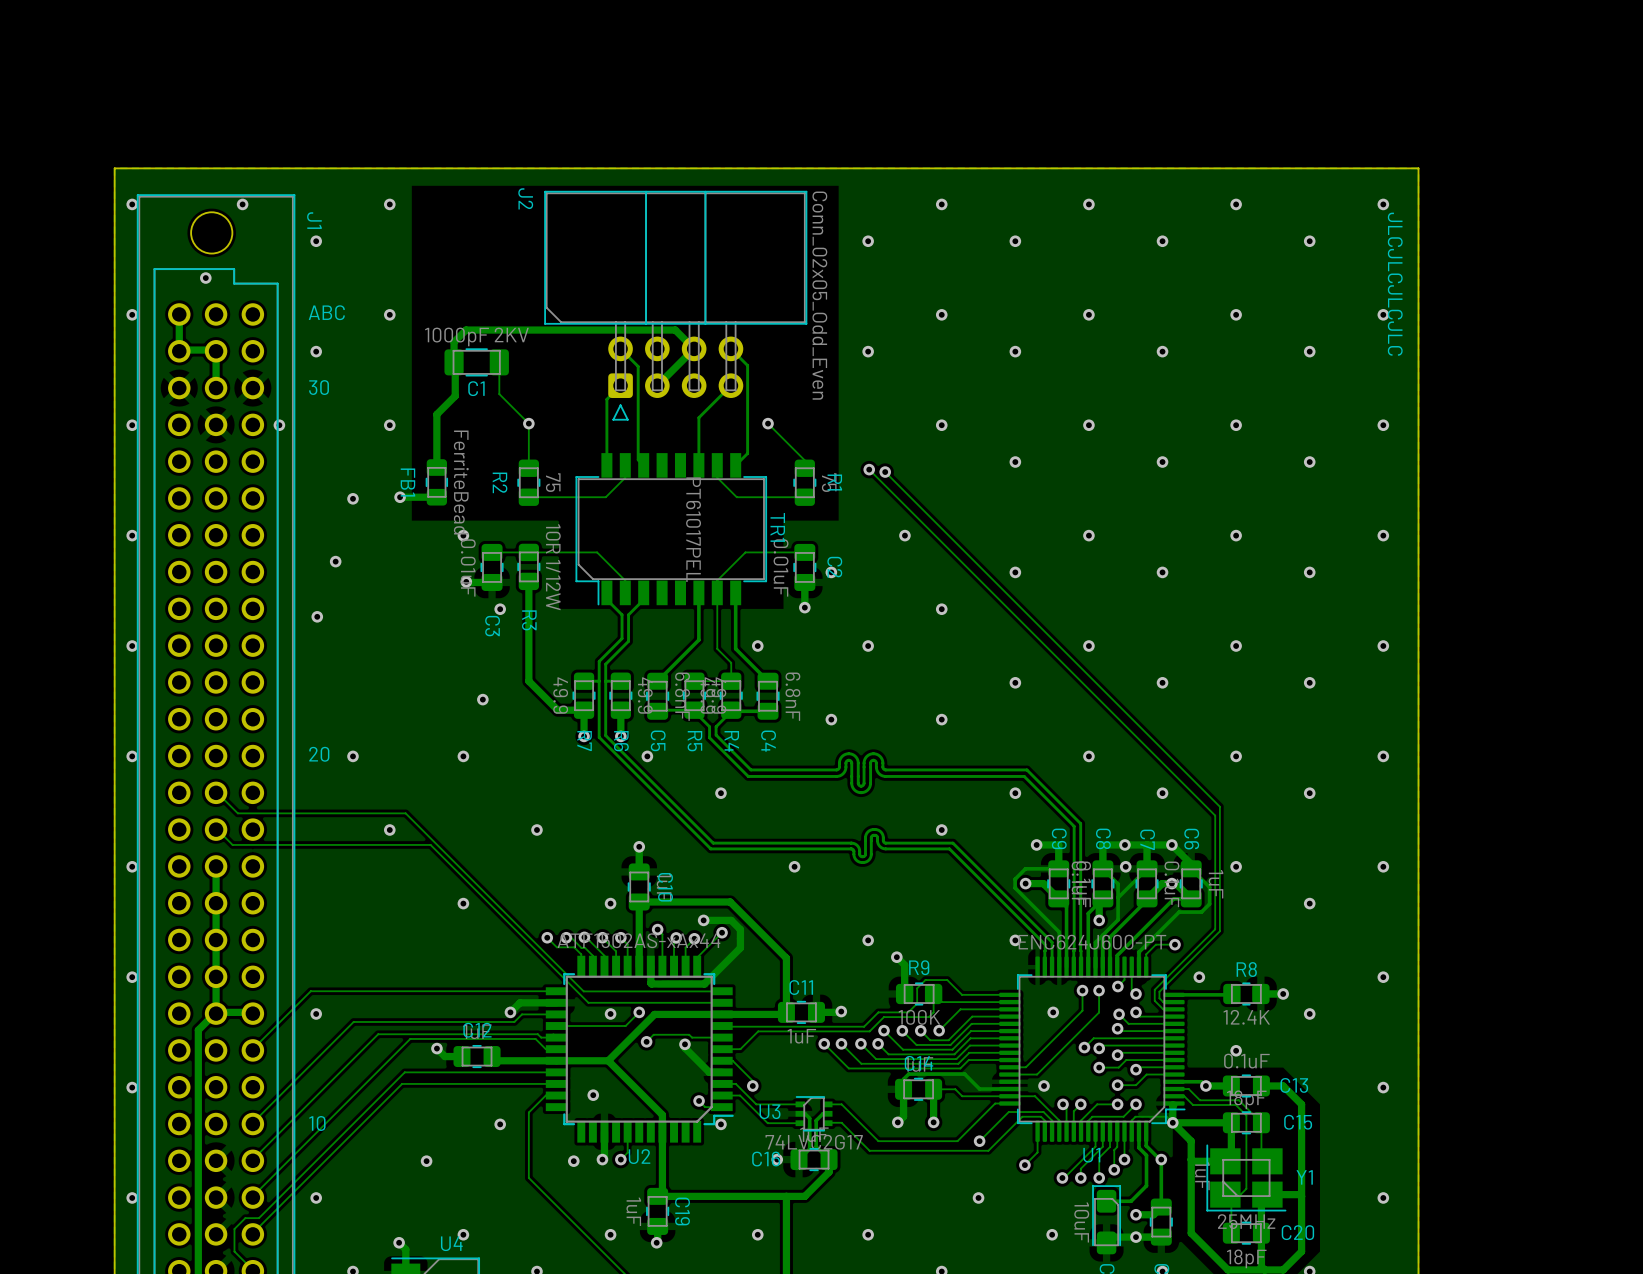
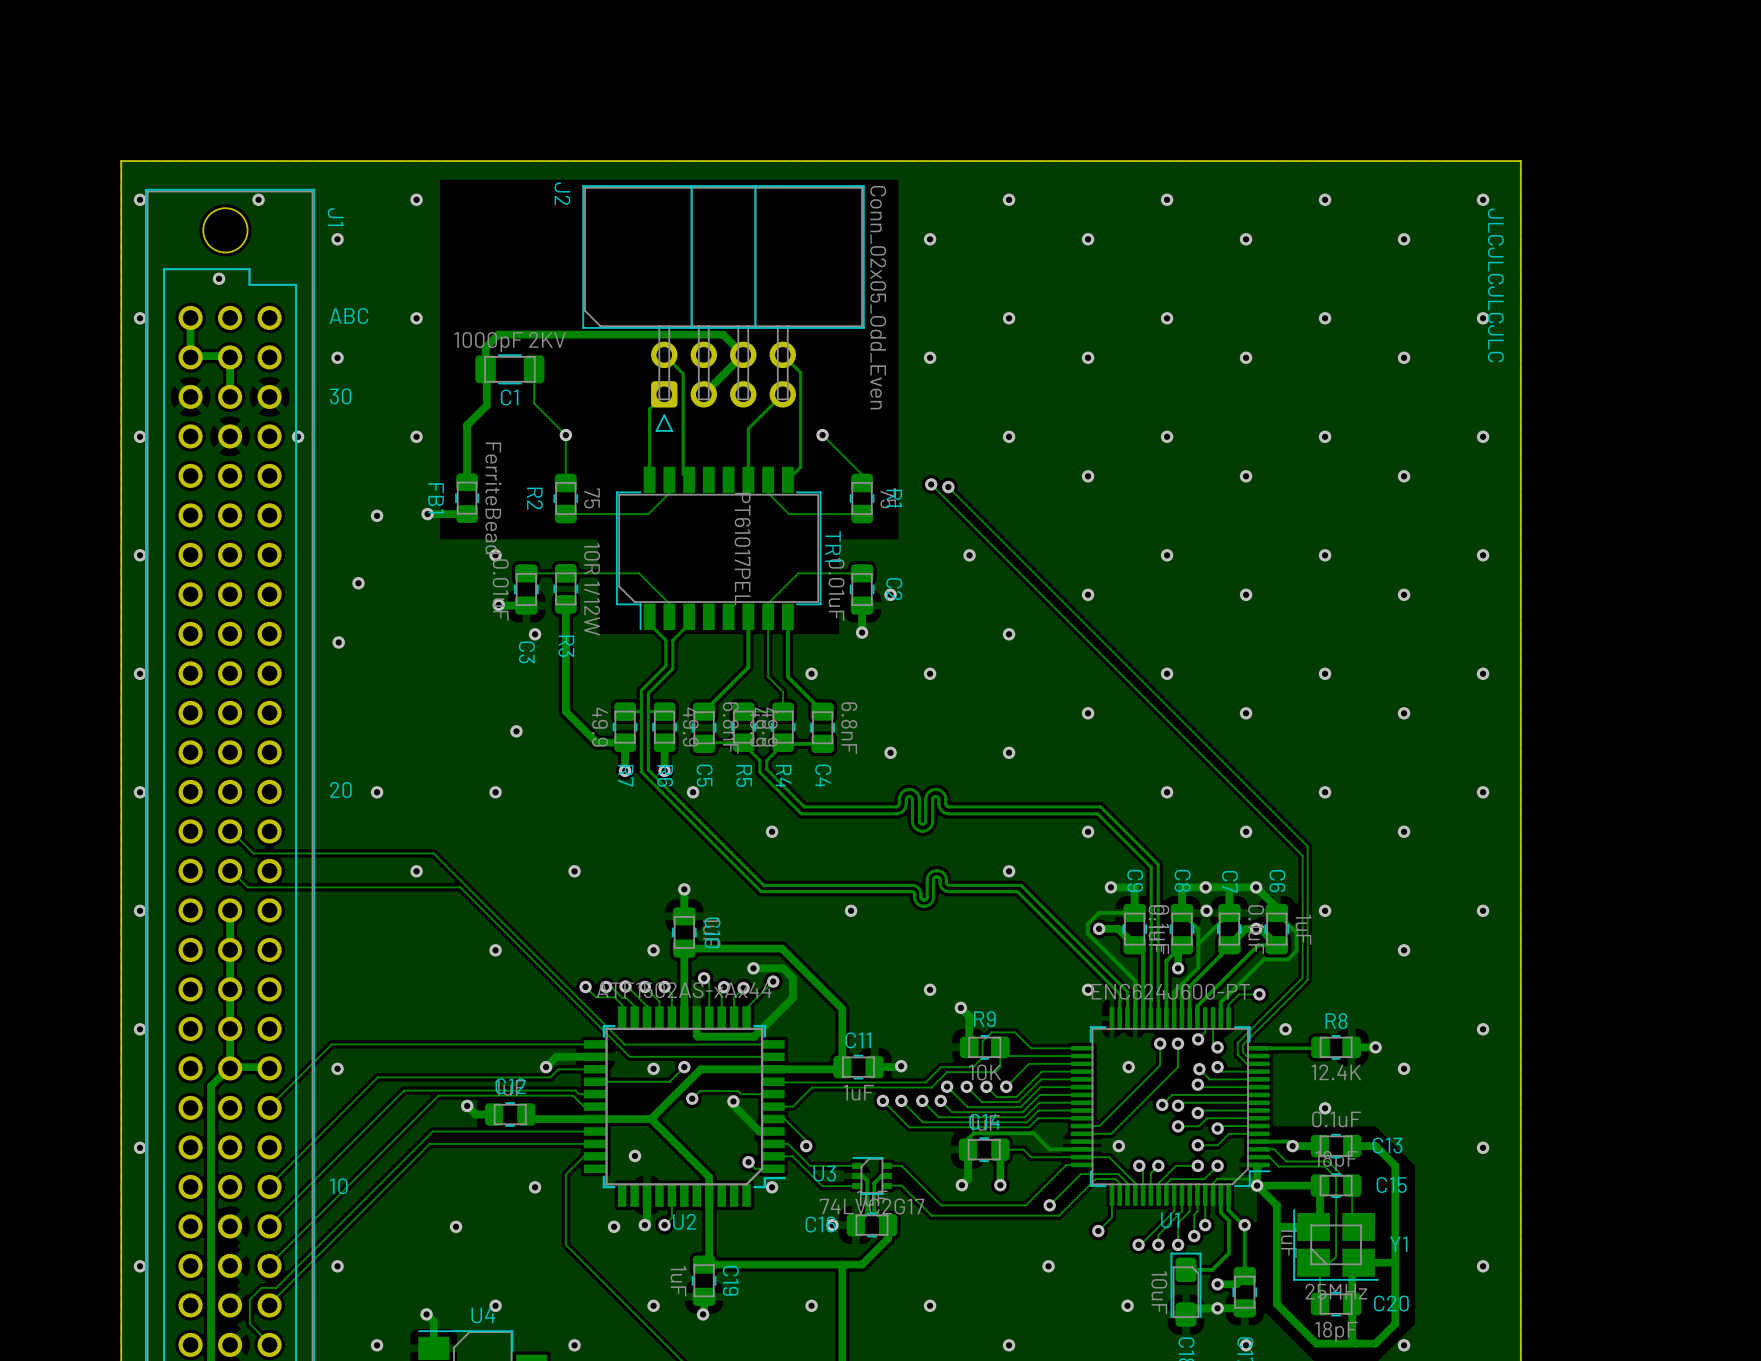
R9 value: 100K (919, 1017) -> 10K (985, 1072)

